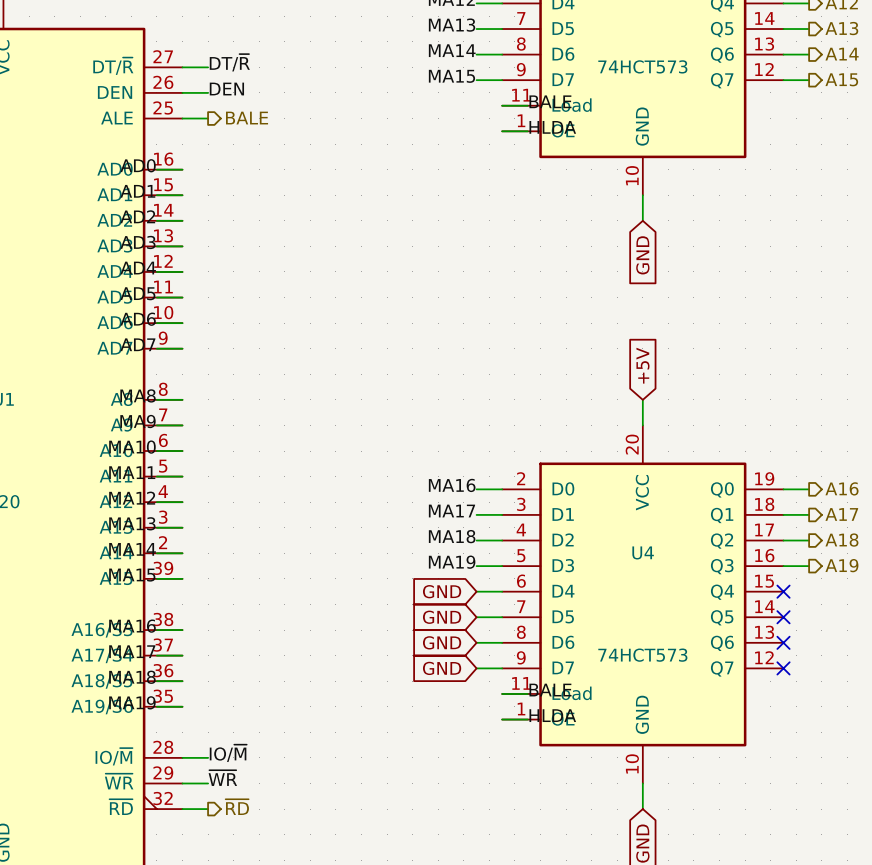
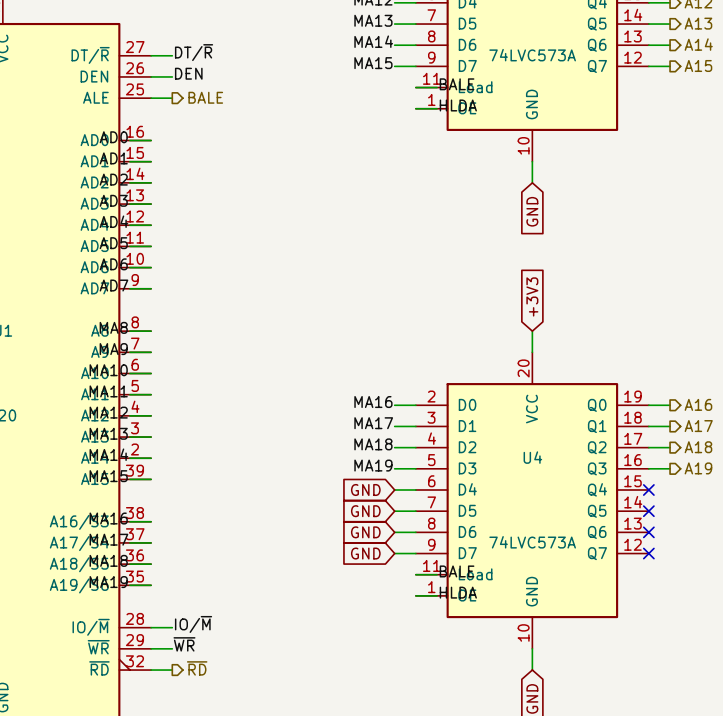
part value: 74HCT573 (642, 66) -> 74LVC573A (532, 55)
global label: +5V (642, 365) -> +3V3 (532, 296)
U4 value: 74HCT573 (642, 655) -> 74LVC573A (532, 542)

